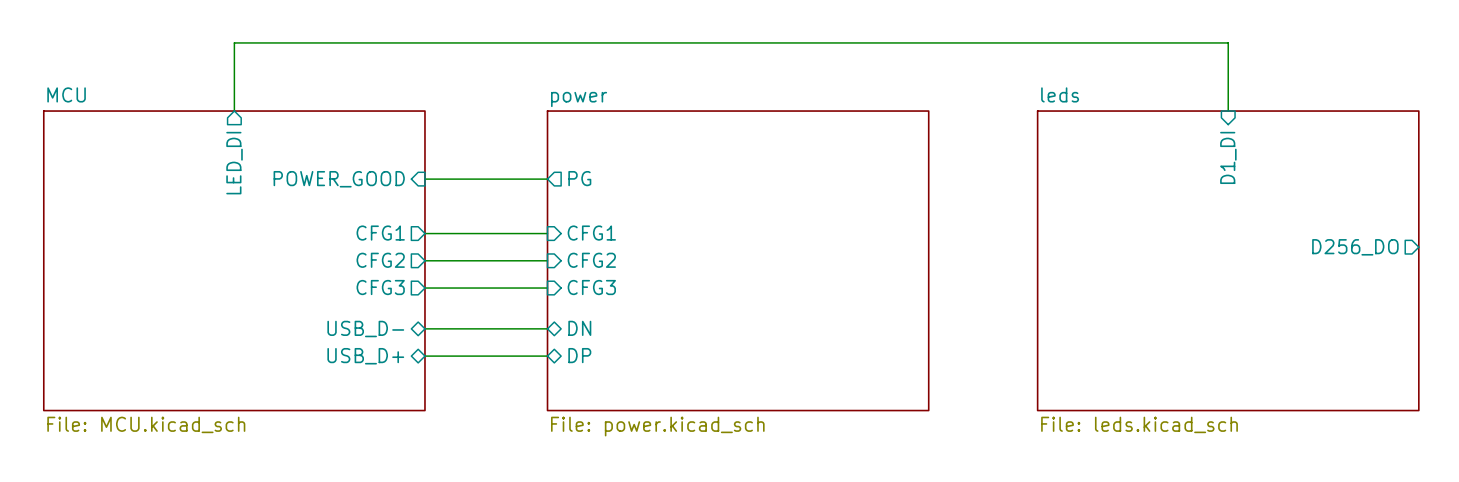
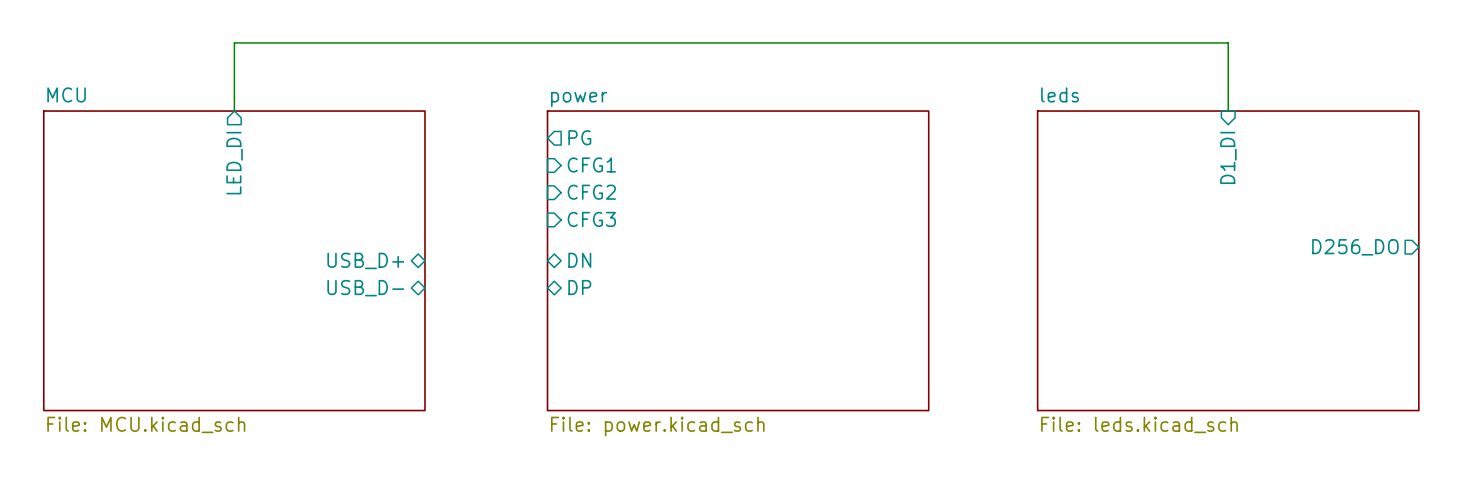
sheet pin position: PG (579, 178) -> PG (579, 137)
sheet pin: POWER_GOOD (339, 179) -> none
wire: (424, 179) (547, 179) -> none
sheet pin: none -> CFG2 (591, 192)
sheet pin: none -> CFG3 (591, 219)
sheet pin: CFG1 (380, 233) -> none
wire: (424, 233) (547, 233) -> none
sheet pin position: CFG1 (591, 233) -> CFG1 (591, 164)
sheet pin shape: output (380, 260) -> bidirectional (365, 260)
sheet pin: CFG2 (380, 260) -> USB_D+ (365, 260)
wire: (424, 260) (547, 260) -> none
sheet pin shape: input (591, 260) -> bidirectional (579, 260)
sheet pin: CFG2 (591, 260) -> DN (579, 260)
sheet pin shape: output (380, 287) -> bidirectional (365, 288)
sheet pin: CFG3 (380, 287) -> USB_D- (365, 288)
sheet pin shape: input (591, 287) -> bidirectional (579, 287)
sheet pin: CFG3 (591, 287) -> DP (579, 287)
wire: (424, 288) (547, 288) -> none
wire: (424, 328) (547, 328) -> none
sheet pin: DN (579, 328) -> none
sheet pin: USB_D- (365, 329) -> none
sheet pin: DP (579, 355) -> none
sheet pin: USB_D+ (365, 356) -> none
wire: (424, 356) (547, 356) -> none

